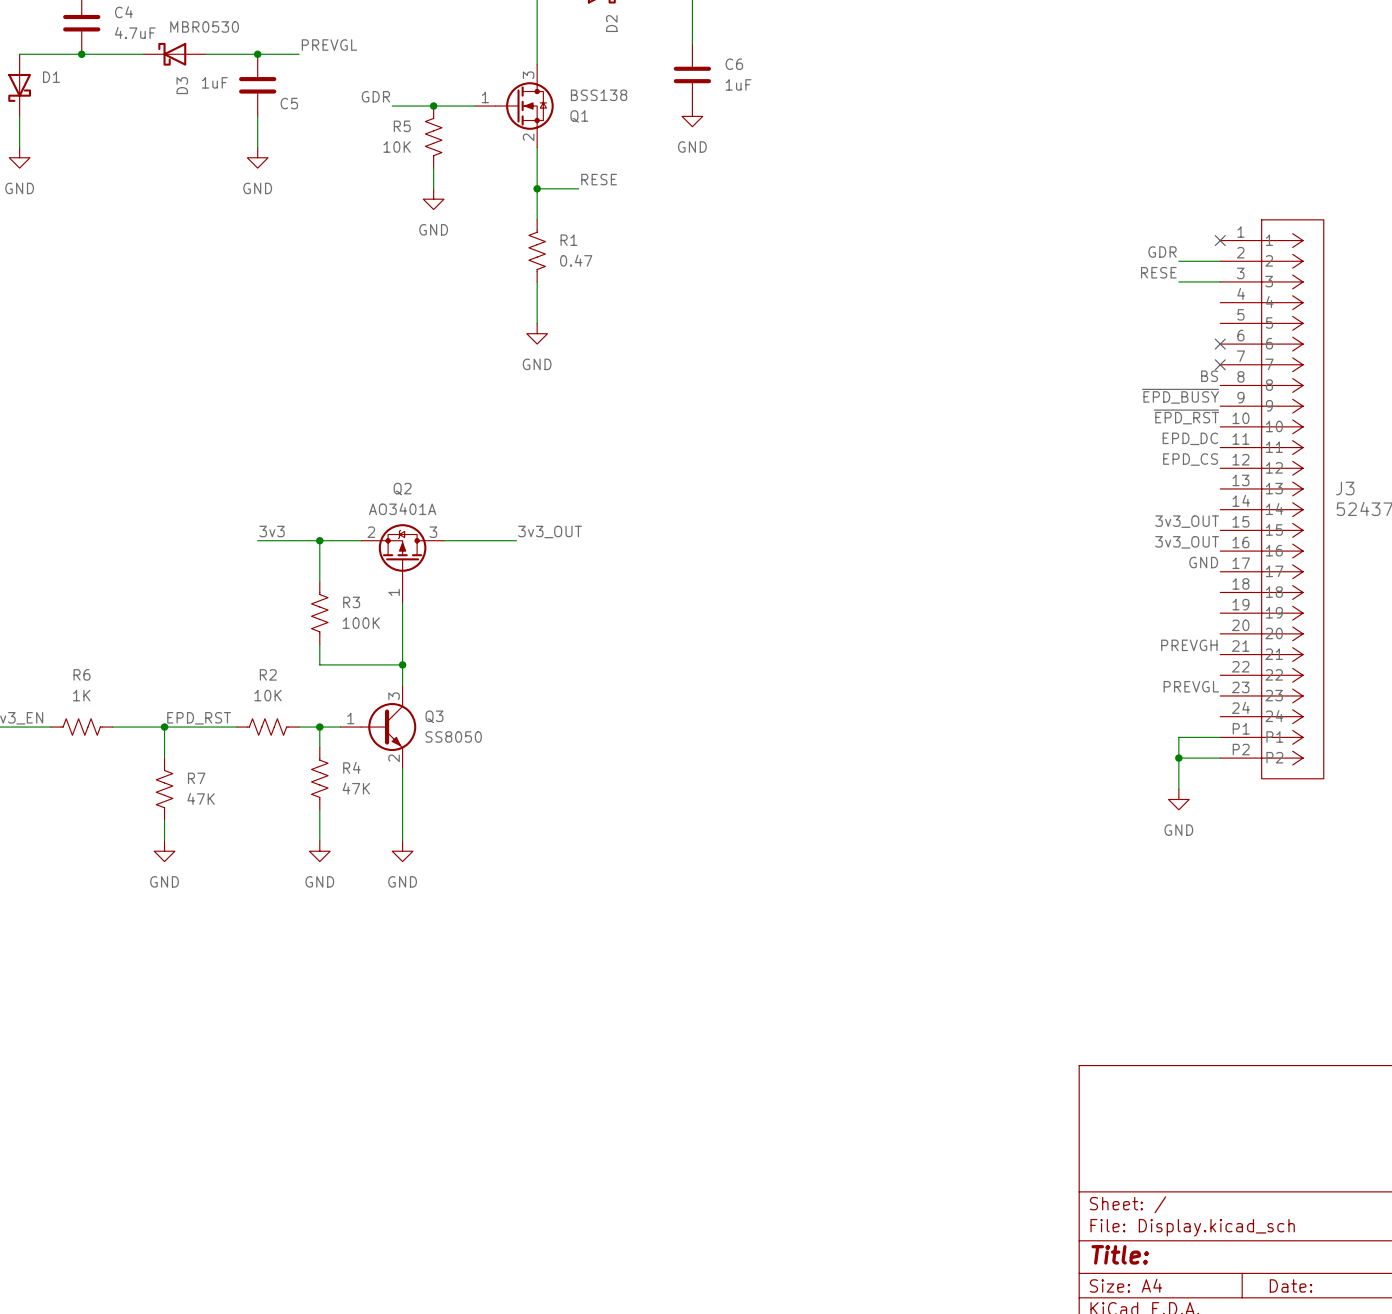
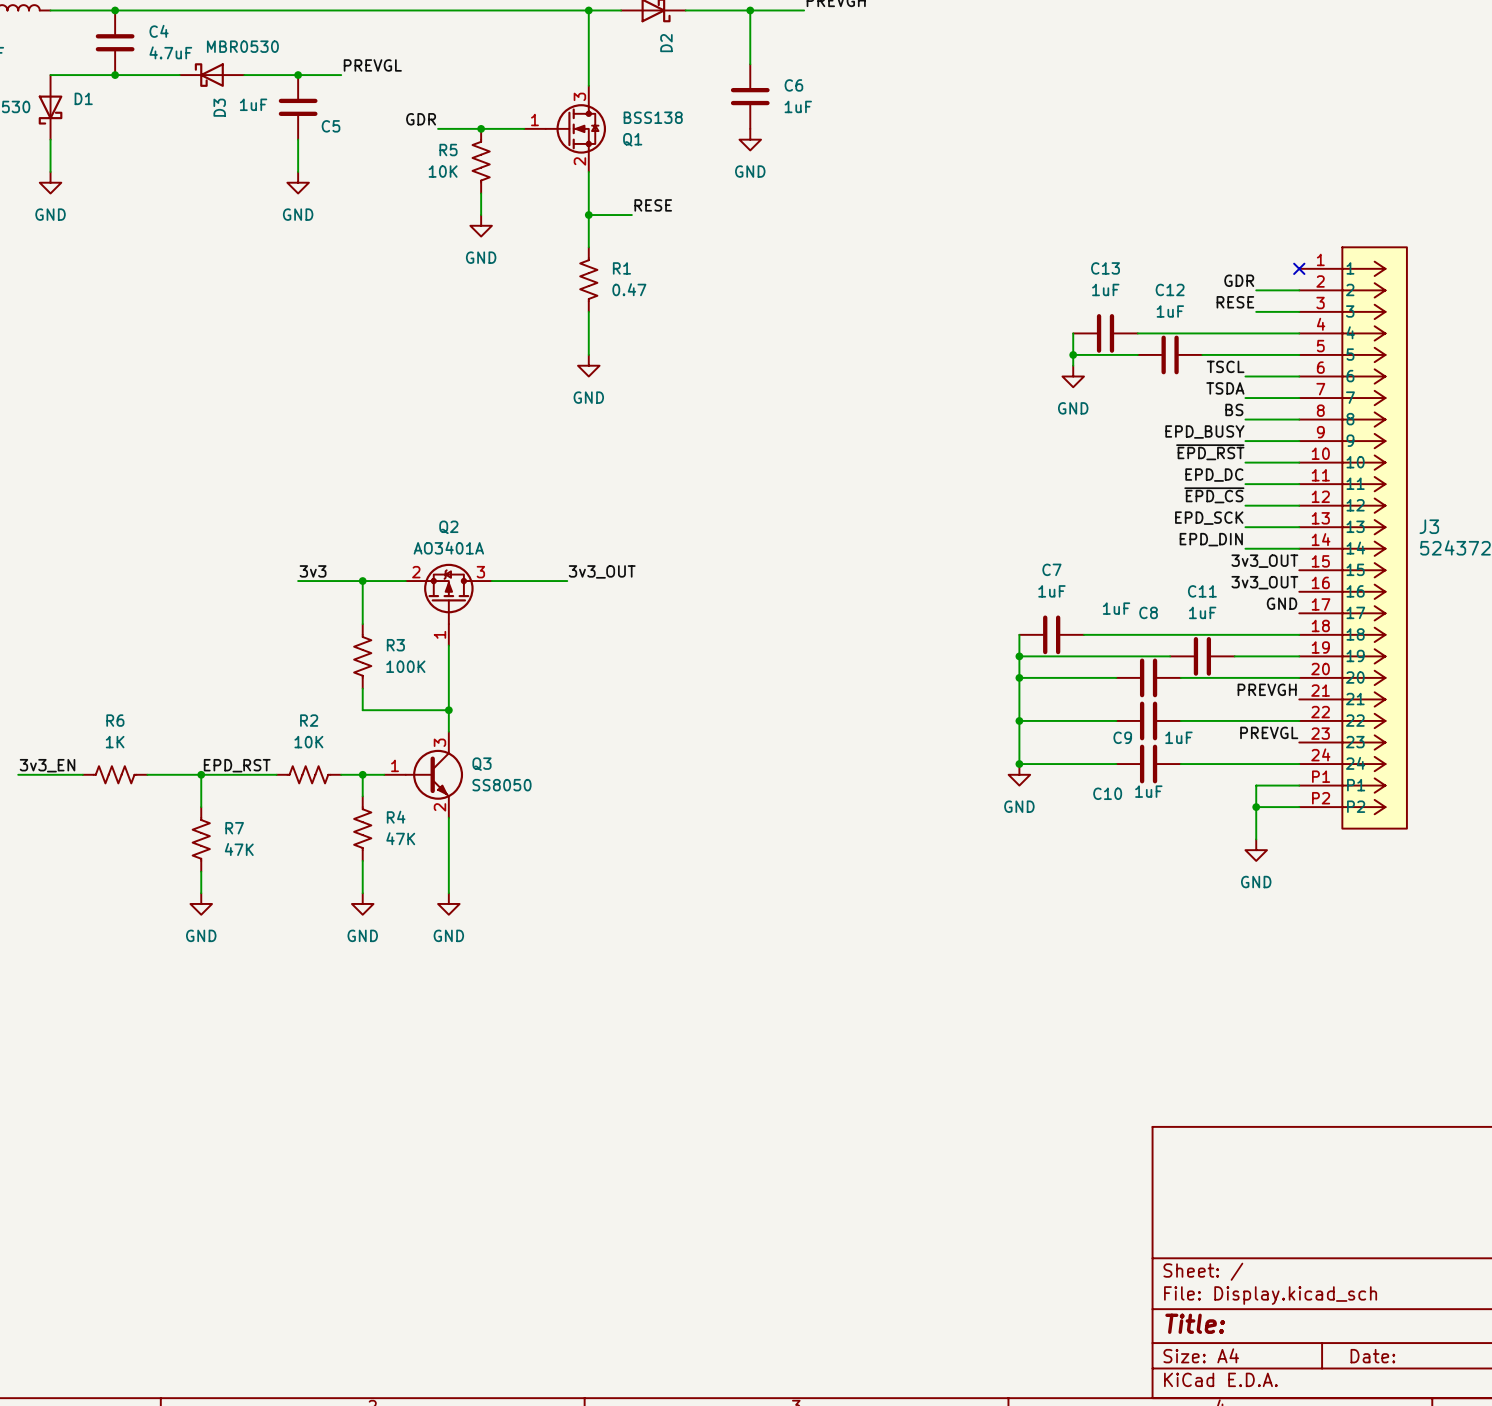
wire: none -> (1073, 333) (1073, 365)
C13: none -> 1uF (1105, 333)
wire: none -> (1137, 333) (1299, 333)
wire: none -> (1073, 354) (1137, 354)
junction: none -> (1073, 354)
C12: none -> 1uF (1170, 354)
wire: none -> (1202, 354) (1299, 354)
label: none -> TSCL (1225, 366)
power symbol: none -> GND (1073, 376)
wire: none -> (1245, 376) (1299, 376)
no-connect mark: (1220, 344) -> none
label: none -> TSDA (1225, 388)
wire: none -> (1245, 398) (1299, 398)
no-connect mark: (1220, 364) -> none
label position: BS (1209, 376) -> BS (1234, 409)
wire: none -> (1245, 419) (1299, 419)
label: ~{EPD_BUSY} (1180, 396) -> EPD_BUSY (1204, 431)
wire: none -> (1245, 441) (1299, 441)
label position: ~{EPD_RST} (1186, 416) -> ~{EPD_RST} (1210, 452)
wire: none -> (1245, 462) (1299, 462)
label position: EPD_DC (1190, 438) -> EPD_DC (1214, 475)
wire: none -> (1245, 484) (1299, 484)
label: none -> ~{EPD_CS} (1214, 495)
label: EPD_CS (1190, 459) -> none
wire: none -> (1245, 505) (1299, 505)
label: none -> EPD_SCK (1209, 518)
wire: none -> (1245, 527) (1299, 527)
label: none -> EPD_DIN (1211, 539)
wire: none -> (1245, 548) (1299, 548)
wire: none -> (1019, 634) (1019, 764) (1116, 764)
C7: none -> 1uF (1051, 634)
wire: none -> (1083, 634) (1299, 634)
wire: none -> (1019, 656) (1170, 656)
junction: none -> (1019, 656)
C11: none -> 1uF (1202, 656)
wire: none -> (1234, 656) (1299, 656)
wire: none -> (1019, 677) (1116, 677)
junction: none -> (1019, 677)
C8: none -> 1uF (1148, 677)
wire: none -> (1180, 677) (1299, 677)
wire: none -> (1019, 720) (1116, 720)
junction: none -> (1019, 720)
C9: none -> 1uF (1148, 720)
wire: none -> (1180, 720) (1299, 720)
junction: none -> (1019, 764)
C10: none -> 1uF (1148, 764)
wire: none -> (1180, 764) (1299, 764)
power symbol: none -> GND (1019, 774)

